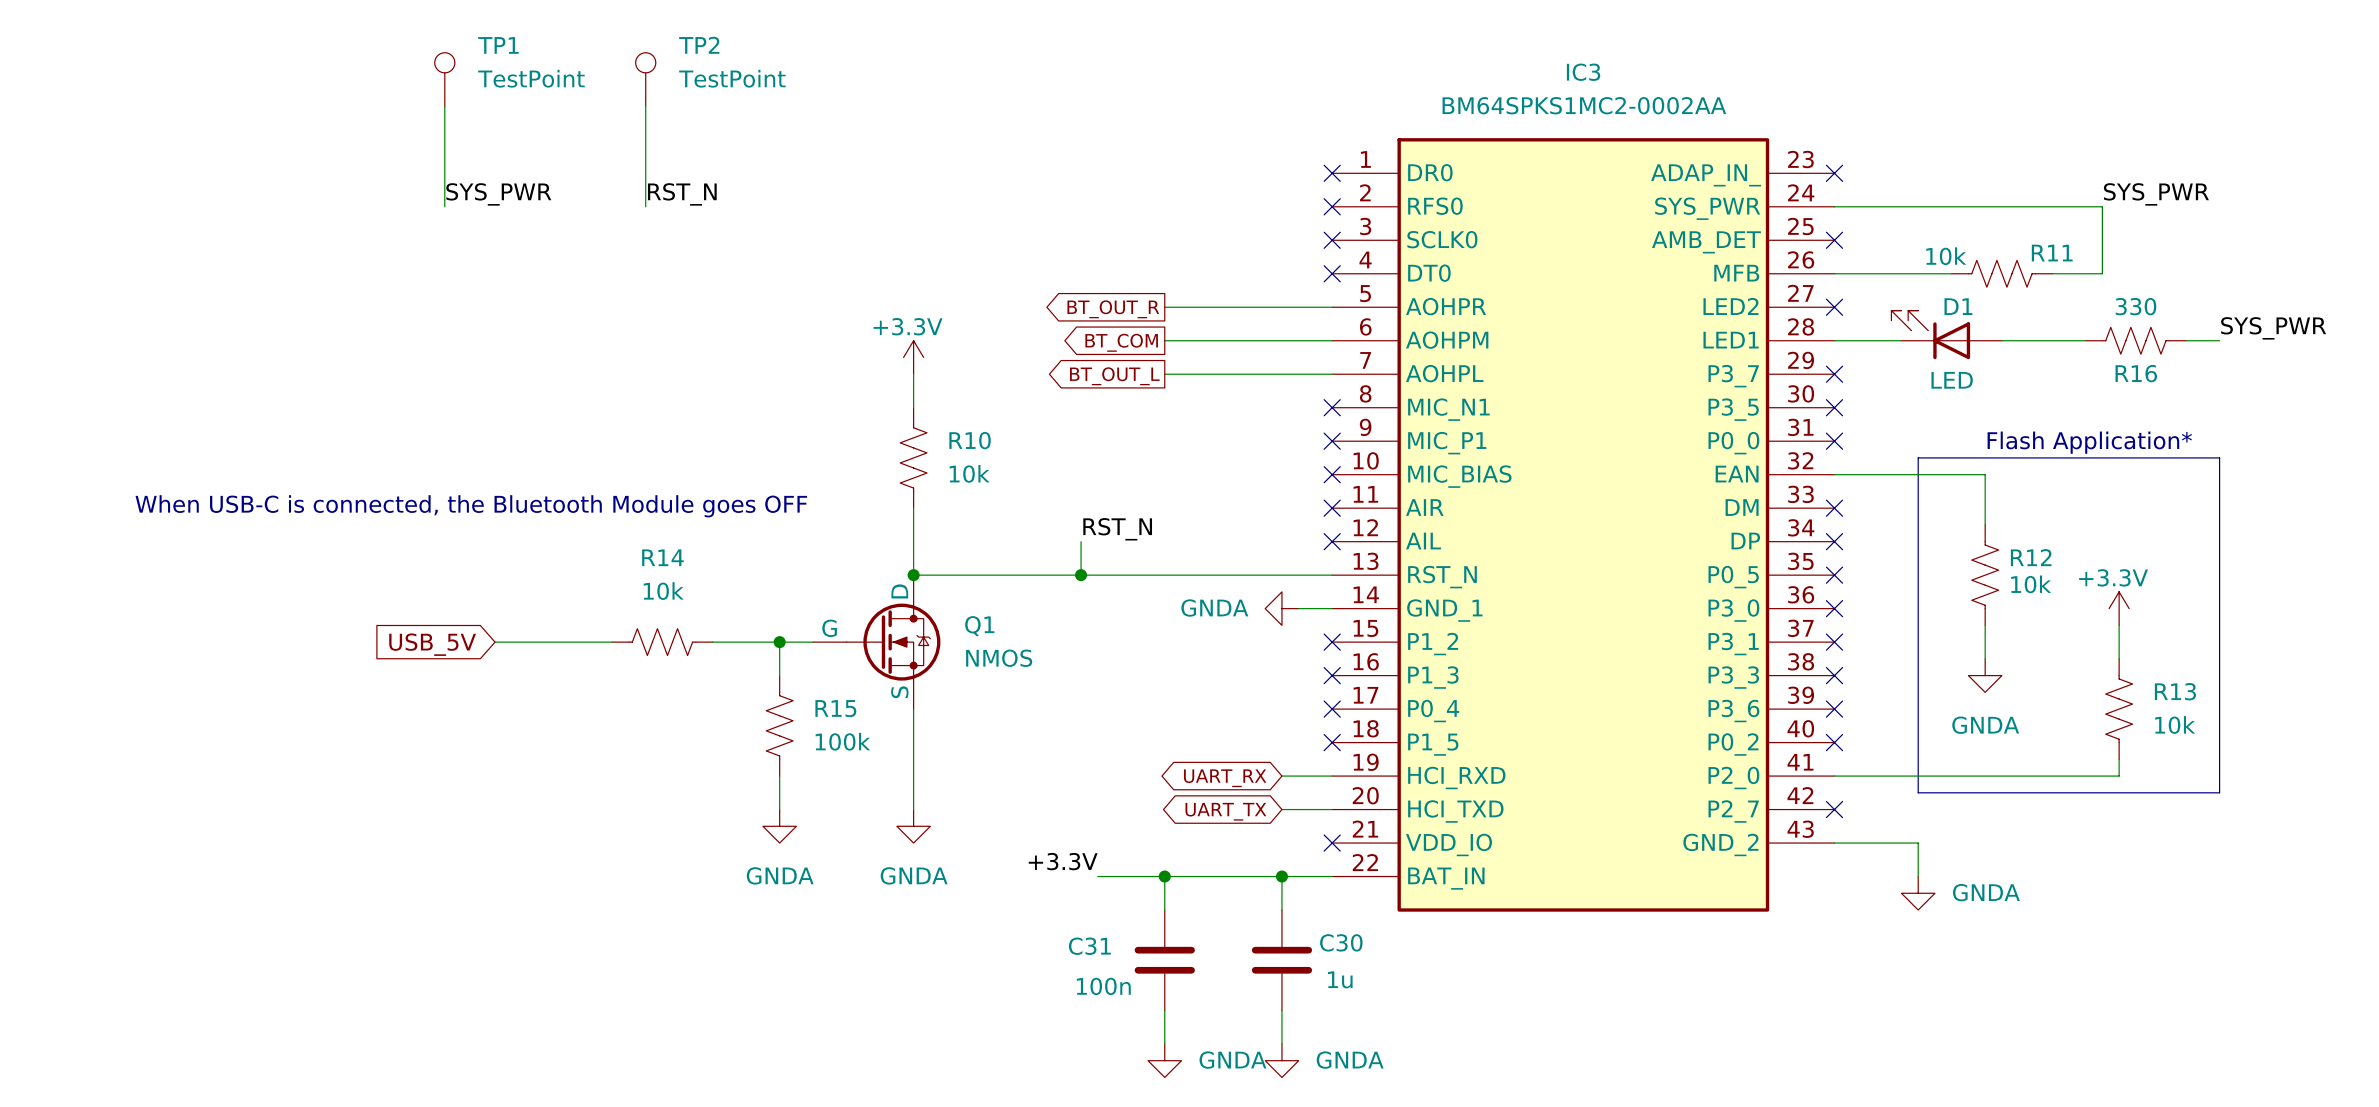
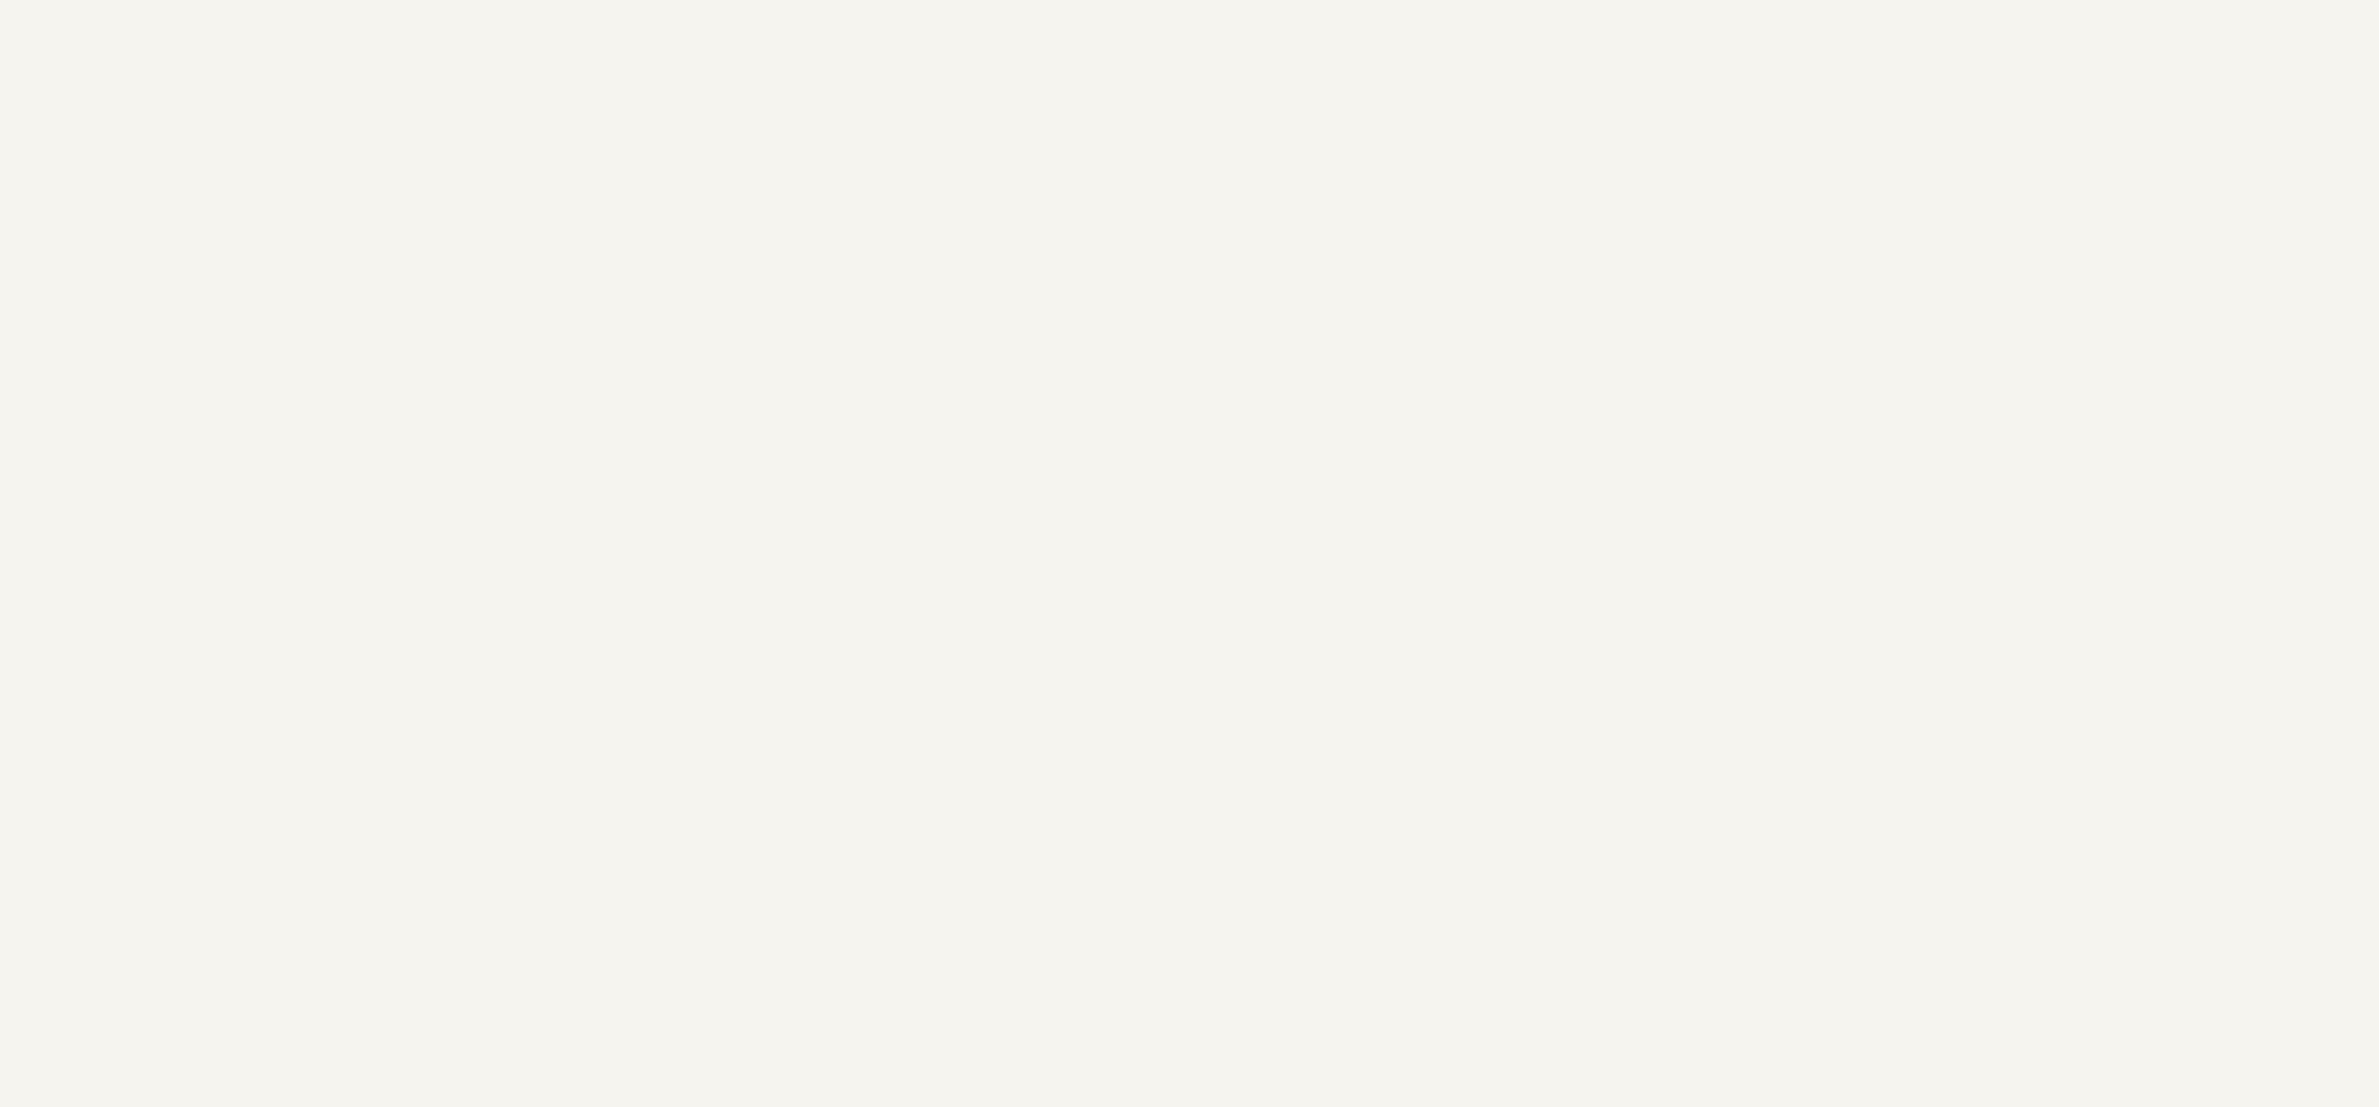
TP1: TestPoint (444, 79) -> none
TP2: TestPoint (645, 79) -> none
wire: (444, 106) (444, 206) -> none
wire: (645, 106) (645, 206) -> none
no-connect mark: (1332, 173) -> none
no-connect mark: (1834, 173) -> none
label: SYS_PWR (498, 194) -> none
label: RST_N (682, 194) -> none
label: SYS_PWR (2156, 194) -> none
no-connect mark: (1332, 206) -> none
wire: (1834, 206) (2102, 206) (2102, 273) (2052, 273) -> none
no-connect mark: (1332, 240) -> none
no-connect mark: (1834, 240) -> none
no-connect mark: (1332, 273) -> none
wire: (1834, 273) (1951, 273) -> none
R11: 10k (2001, 273) -> none
wire: (1164, 307) (1332, 307) -> none
no-connect mark: (1834, 307) -> none
global label: BT_OUT_R (1113, 309) -> none
label: SYS_PWR (2273, 328) -> none
D1: LED (1946, 334) -> none
wire: (1164, 340) (1332, 340) -> none
wire: (1834, 340) (1901, 340) -> none
wire: (2001, 340) (2085, 340) -> none
R16: 330 (2135, 340) -> none
wire: (2186, 340) (2219, 340) -> none
global label: BT_COM (1121, 342) -> none
power symbol: +3.3V (913, 357) -> none
wire: (913, 374) (913, 407) -> none
wire: (1164, 374) (1332, 374) -> none
no-connect mark: (1834, 374) -> none
global label: BT_OUT_L (1114, 376) -> none
no-connect mark: (1332, 407) -> none
no-connect mark: (1834, 407) -> none
no-connect mark: (1332, 441) -> none
no-connect mark: (1834, 441) -> none
text: Flash Application* (2089, 442) -> none
R10: 10k (913, 457) -> none
line: (1918, 457) (2219, 457) (2219, 792) (1918, 792) (1918, 457) -> none
no-connect mark: (1332, 474) -> none
wire: (1834, 474) (1985, 474) (1985, 524) -> none
text: When USB-C is connected, the Bluetooth Module goes OFF (471, 506) -> none
wire: (913, 508) (913, 575) (1332, 575) -> none
no-connect mark: (1332, 508) -> none
no-connect mark: (1834, 508) -> none
IC3: BM64SPKS1MC2-0002AA (1583, 524) -> none
label: RST_N (1117, 529) -> none
wire: (1081, 541) (1081, 575) -> none
no-connect mark: (1332, 541) -> none
no-connect mark: (1834, 541) -> none
junction: (913, 575) -> none
junction: (1081, 575) -> none
no-connect mark: (1834, 575) -> none
R12: 10k (1985, 575) -> none
power symbol: GNDA (1281, 608) -> none
wire: (1298, 608) (1332, 608) -> none
no-connect mark: (1834, 608) -> none
power symbol: +3.3V (2119, 608) -> none
wire: (1985, 625) (1985, 658) -> none
wire: (2119, 625) (2119, 658) -> none
wire: (495, 642) (612, 642) -> none
R14: 10k (662, 642) -> none
wire: (712, 642) (813, 642) -> none
wire: (779, 642) (779, 675) -> none
junction: (779, 642) -> none
Q1: NMOS (876, 642) -> none
no-connect mark: (1332, 642) -> none
no-connect mark: (1834, 642) -> none
global label: USB_5V (432, 644) -> none
no-connect mark: (1332, 675) -> none
no-connect mark: (1834, 675) -> none
power symbol: GNDA (1985, 675) -> none
wire: (913, 709) (913, 809) -> none
no-connect mark: (1332, 709) -> none
no-connect mark: (1834, 709) -> none
R13: 10k (2119, 709) -> none
R15: 100k (779, 725) -> none
no-connect mark: (1332, 742) -> none
no-connect mark: (1834, 742) -> none
wire: (2119, 759) (2119, 776) (1834, 776) -> none
wire: (779, 776) (779, 809) -> none
wire: (1281, 776) (1332, 776) -> none
global label: UART_RX (1225, 778) -> none
wire: (1281, 809) (1332, 809) -> none
no-connect mark: (1834, 809) -> none
global label: UART_TX (1225, 811) -> none
power symbol: GNDA (779, 826) -> none
power symbol: GNDA (913, 826) -> none
no-connect mark: (1332, 843) -> none
wire: (1834, 843) (1918, 843) (1918, 876) -> none
label: +3.3V (1063, 861) -> none
wire: (1097, 876) (1332, 876) -> none
wire: (1164, 876) (1164, 910) -> none
junction: (1164, 876) -> none
wire: (1281, 876) (1281, 910) -> none
junction: (1281, 876) -> none
power symbol: GNDA (1918, 893) -> none
C31: 100n (1164, 960) -> none
C30: 1u (1281, 960) -> none
wire: (1164, 1010) (1164, 1043) -> none
wire: (1281, 1010) (1281, 1043) -> none
power symbol: GNDA (1164, 1060) -> none
power symbol: GNDA (1281, 1060) -> none

